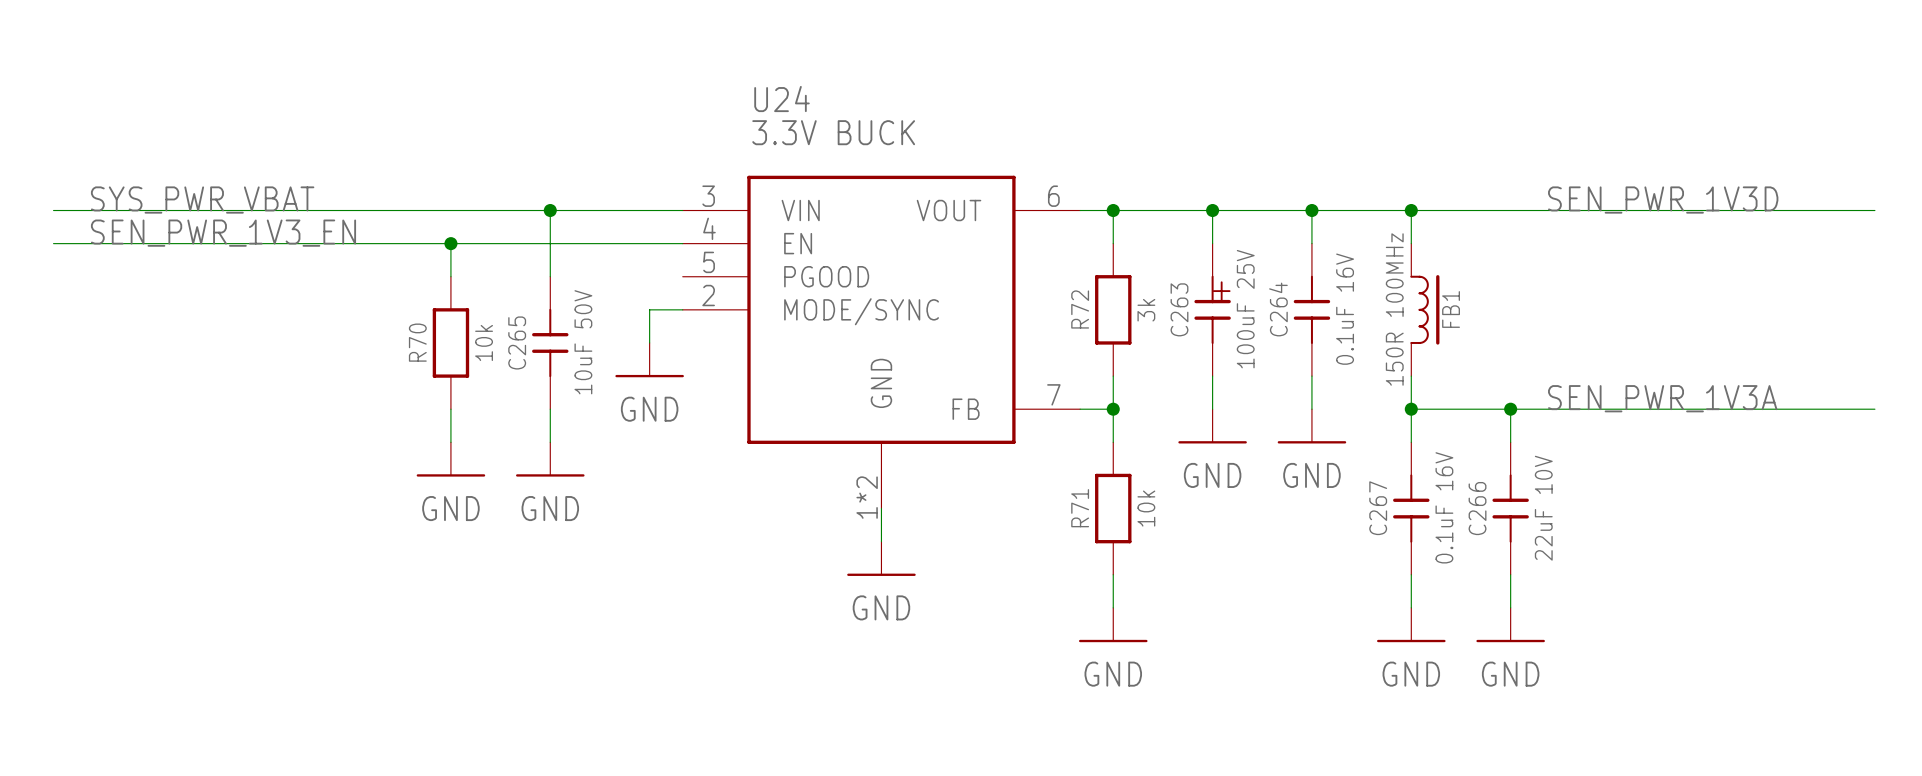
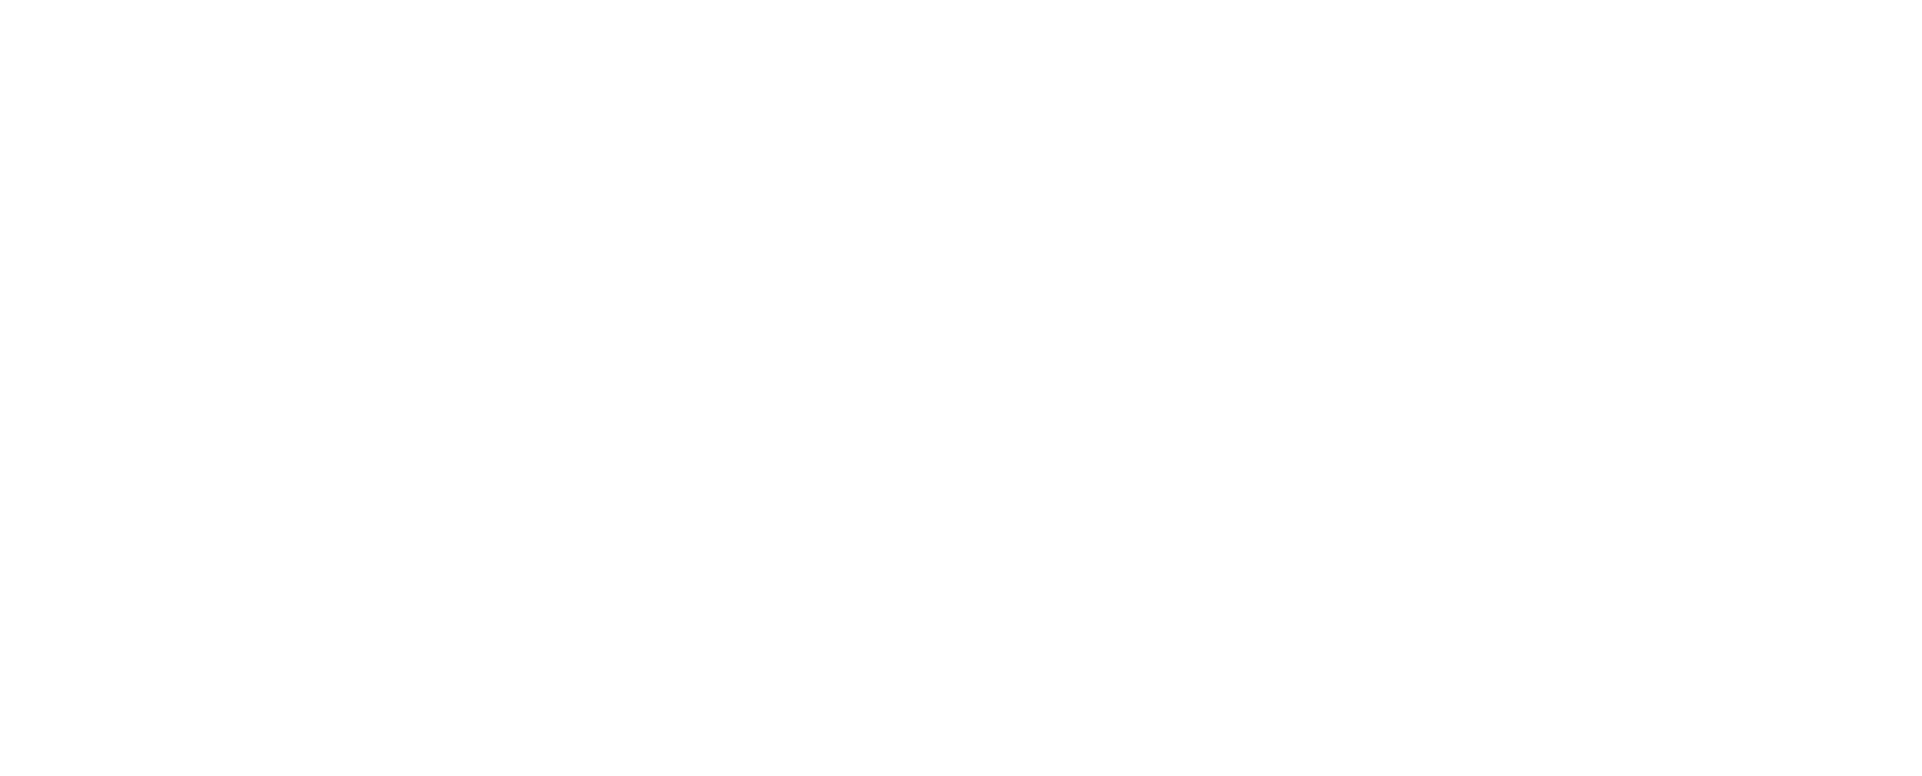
label: SYS_PWR_VBAT (202, 200) -> none
label: SEN_PWR_1V3D (1663, 200) -> none
wire: (53, 210) (682, 210) -> none
wire: (550, 210) (550, 276) -> none
junction: (550, 210) -> none
wire: (1080, 210) (1874, 210) -> none
wire: (1113, 210) (1113, 243) -> none
junction: (1113, 210) -> none
wire: (1212, 210) (1212, 243) -> none
junction: (1212, 210) -> none
wire: (1311, 210) (1311, 243) -> none
junction: (1311, 210) -> none
wire: (1411, 210) (1411, 243) -> none
junction: (1411, 210) -> none
label: SEN_PWR_1V3_EN (223, 233) -> none
wire: (53, 243) (682, 243) -> none
wire: (450, 243) (450, 276) -> none
junction: (450, 243) -> none
wire: (682, 309) (649, 309) (649, 342) -> none
R72: 3k (1113, 309) -> none
C263: 100uF 25V (1212, 309) -> none
C264: 0.1uF 16V (1311, 309) -> none
FB1: 150R 100MHz (1424, 309) -> none
R70: 10k (450, 342) -> none
C265: 10uF 50V (550, 342) -> none
U24: 3.3V BUCK (881, 342) -> none
power symbol: GND (649, 360) -> none
wire: (1113, 376) (1113, 442) -> none
wire: (1212, 376) (1212, 409) -> none
wire: (1311, 376) (1311, 409) -> none
wire: (1411, 376) (1411, 442) -> none
label: SEN_PWR_1V3A (1662, 398) -> none
wire: (450, 409) (450, 442) -> none
wire: (550, 409) (550, 442) -> none
wire: (1080, 409) (1113, 409) -> none
junction: (1113, 409) -> none
wire: (1411, 409) (1874, 409) -> none
junction: (1411, 409) -> none
wire: (1510, 409) (1510, 442) -> none
junction: (1510, 409) -> none
power symbol: GND (1212, 426) -> none
power symbol: GND (1311, 426) -> none
power symbol: GND (450, 459) -> none
power symbol: GND (550, 459) -> none
wire: (881, 508) (881, 541) -> none
R71: 10k (1113, 508) -> none
C267: 0.1uF 16V (1411, 508) -> none
C266: 22uF 10V (1510, 508) -> none
power symbol: GND (881, 558) -> none
wire: (1113, 574) (1113, 607) -> none
wire: (1411, 574) (1411, 607) -> none
wire: (1510, 574) (1510, 607) -> none
power symbol: GND (1113, 625) -> none
power symbol: GND (1411, 625) -> none
power symbol: GND (1510, 625) -> none

